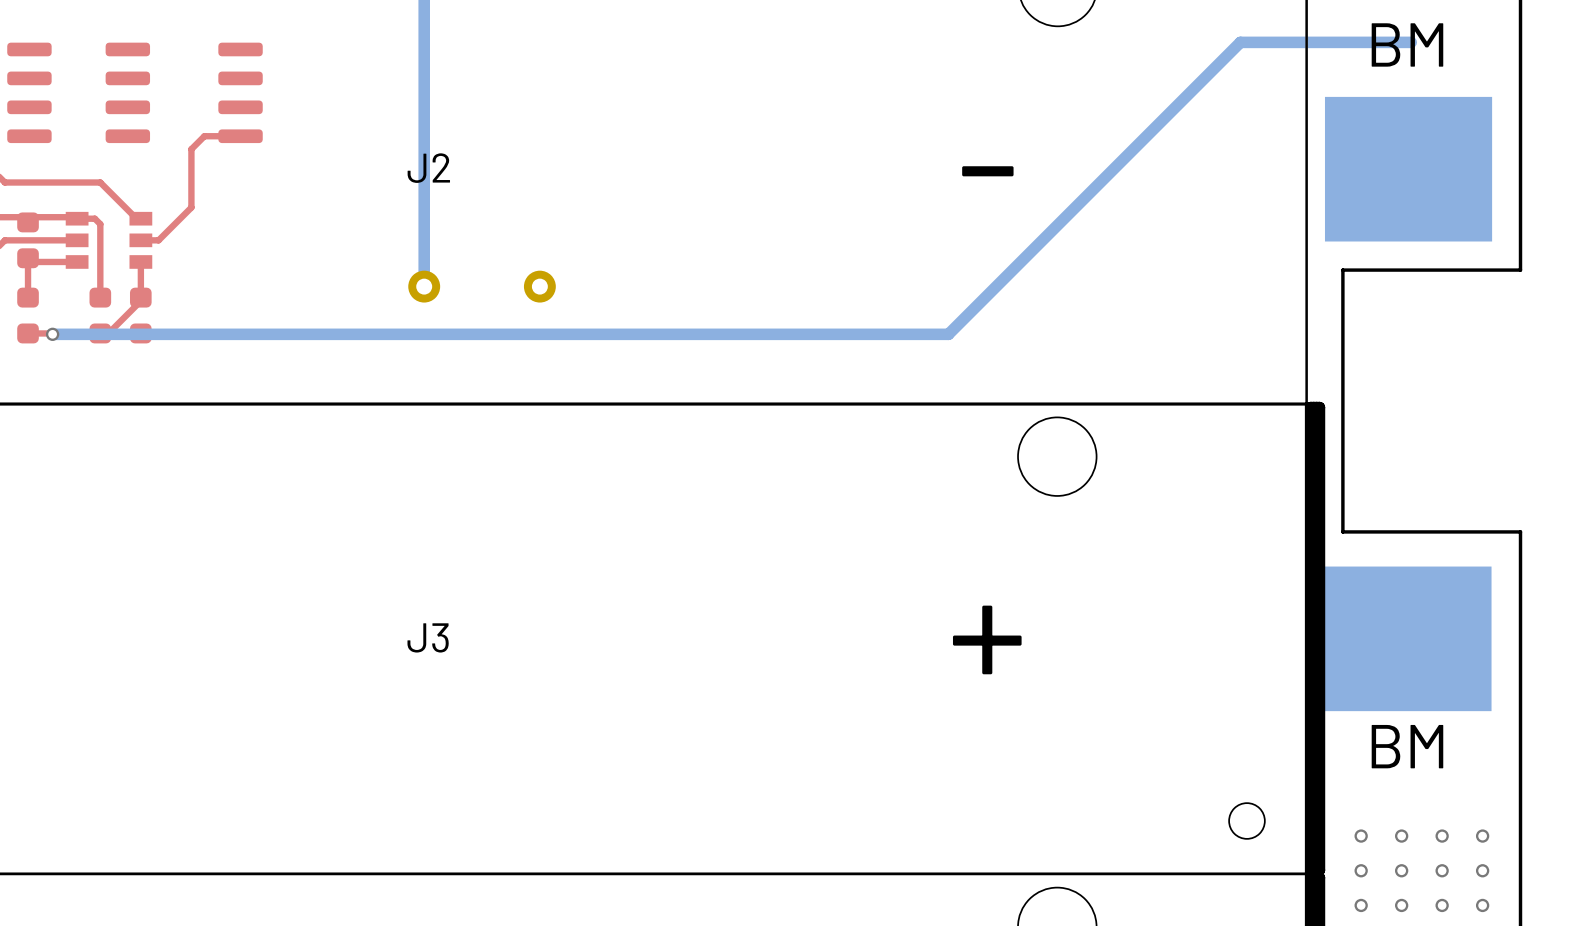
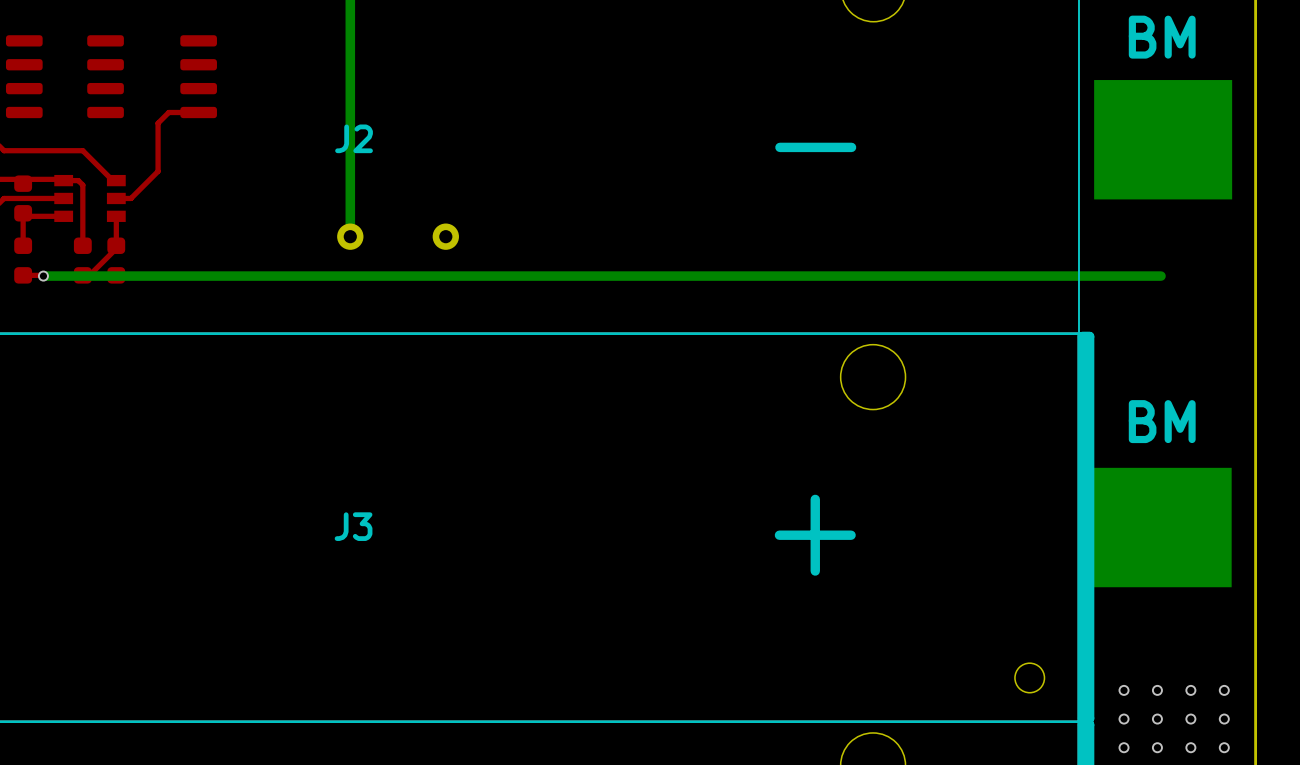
bottom track: (1411, 42) (1240, 42) (948, 334) -> (1161, 276) (783, 276)
board edge: (1520, 270) (1342, 270) (1342, 531) (1520, 531) -> (1255, 223) (1255, 439)
text position: BM (1407, 746) -> BM (1162, 421)

